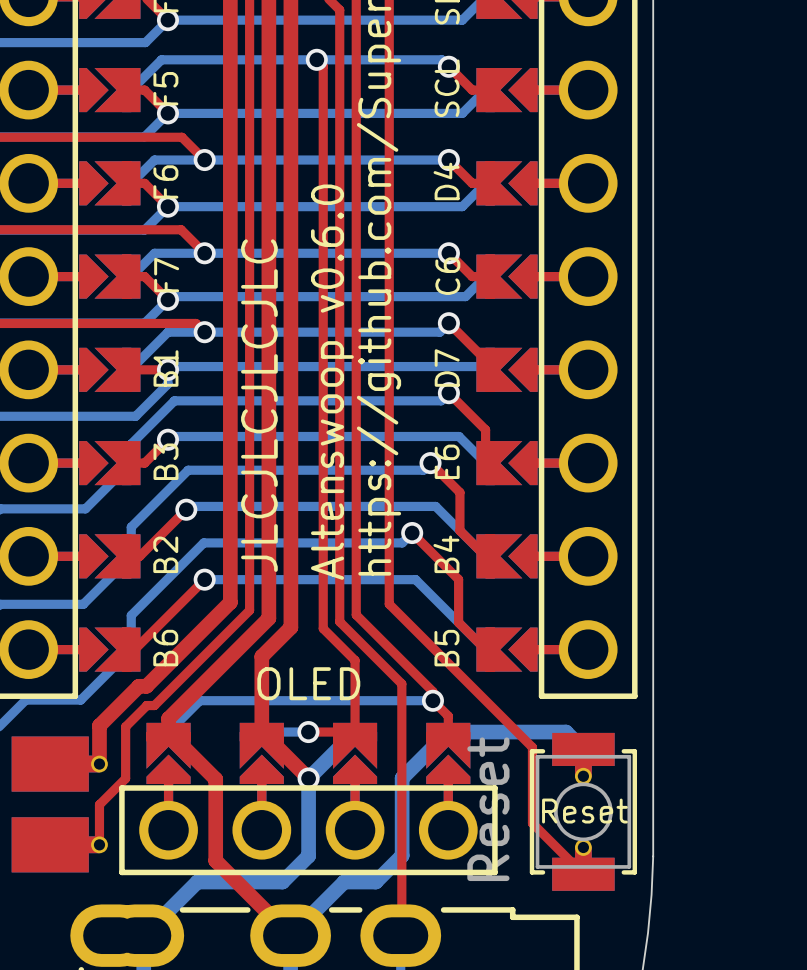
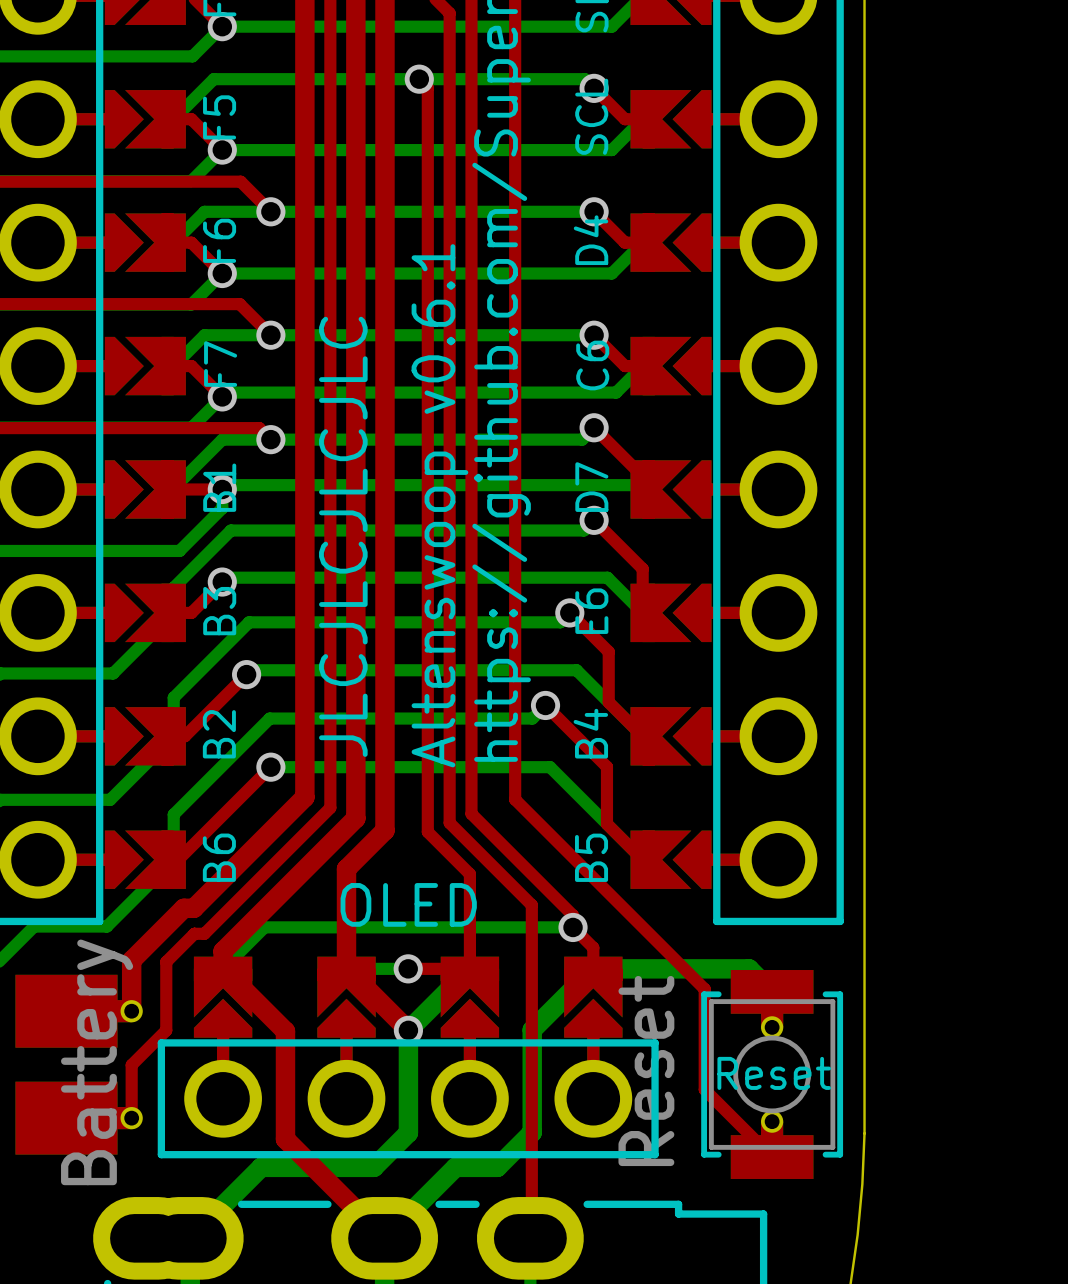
text: Altenswoop v0.6.0 (332, 382) -> Altenswoop v0.6.1 (439, 505)
part value: none -> Battery (97, 1062)

